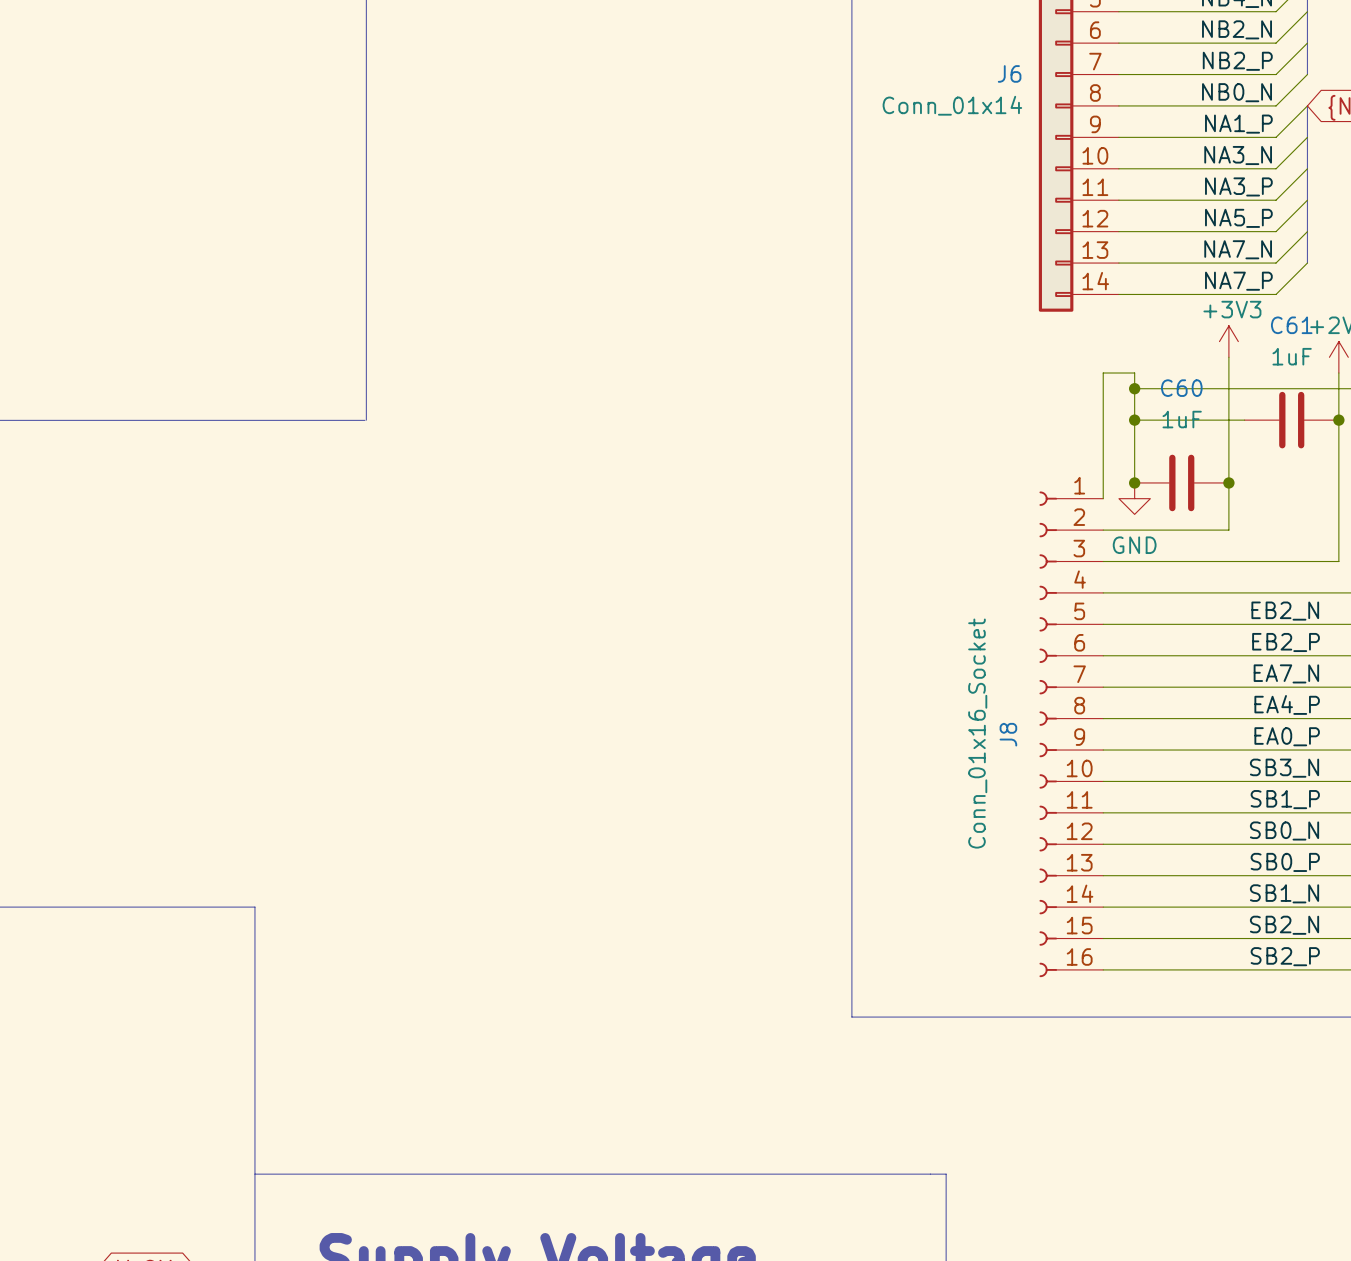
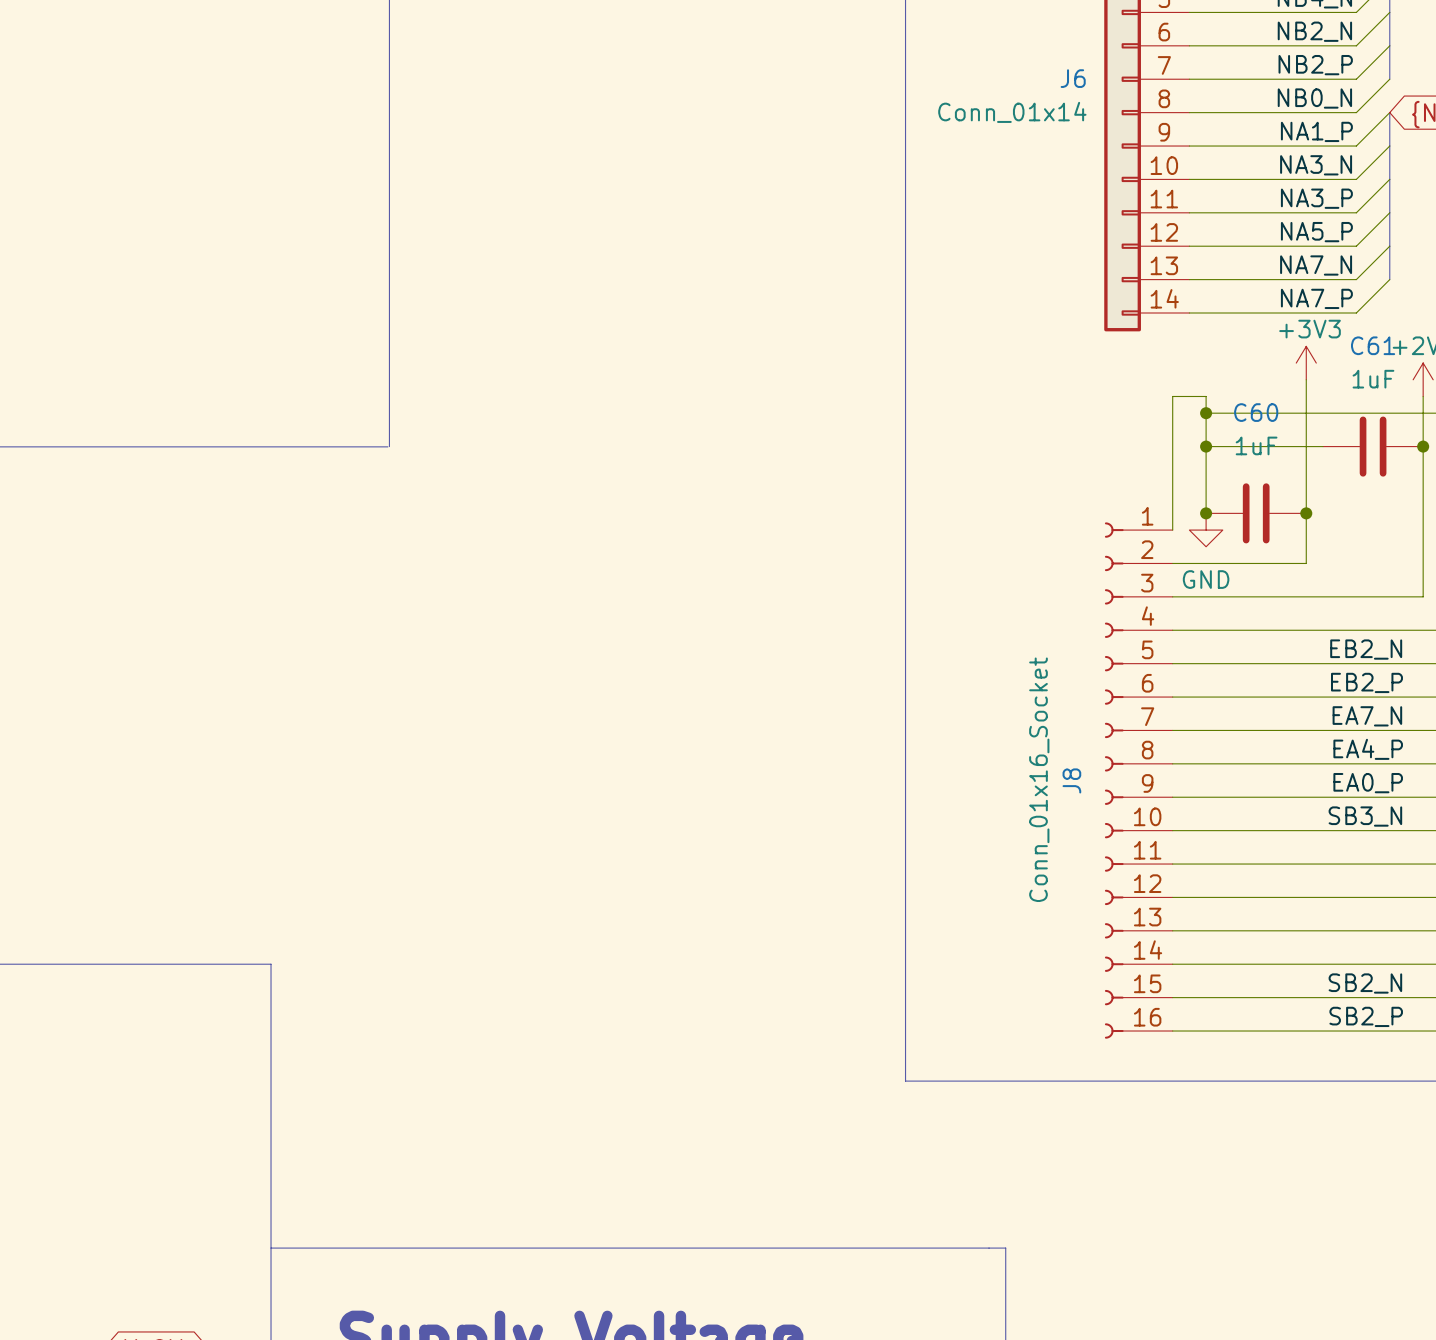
label: SB1_P (1285, 799) -> none
label: SB0_N (1284, 831) -> none
label: SB0_P (1285, 862) -> none
label: SB1_N (1284, 893) -> none

